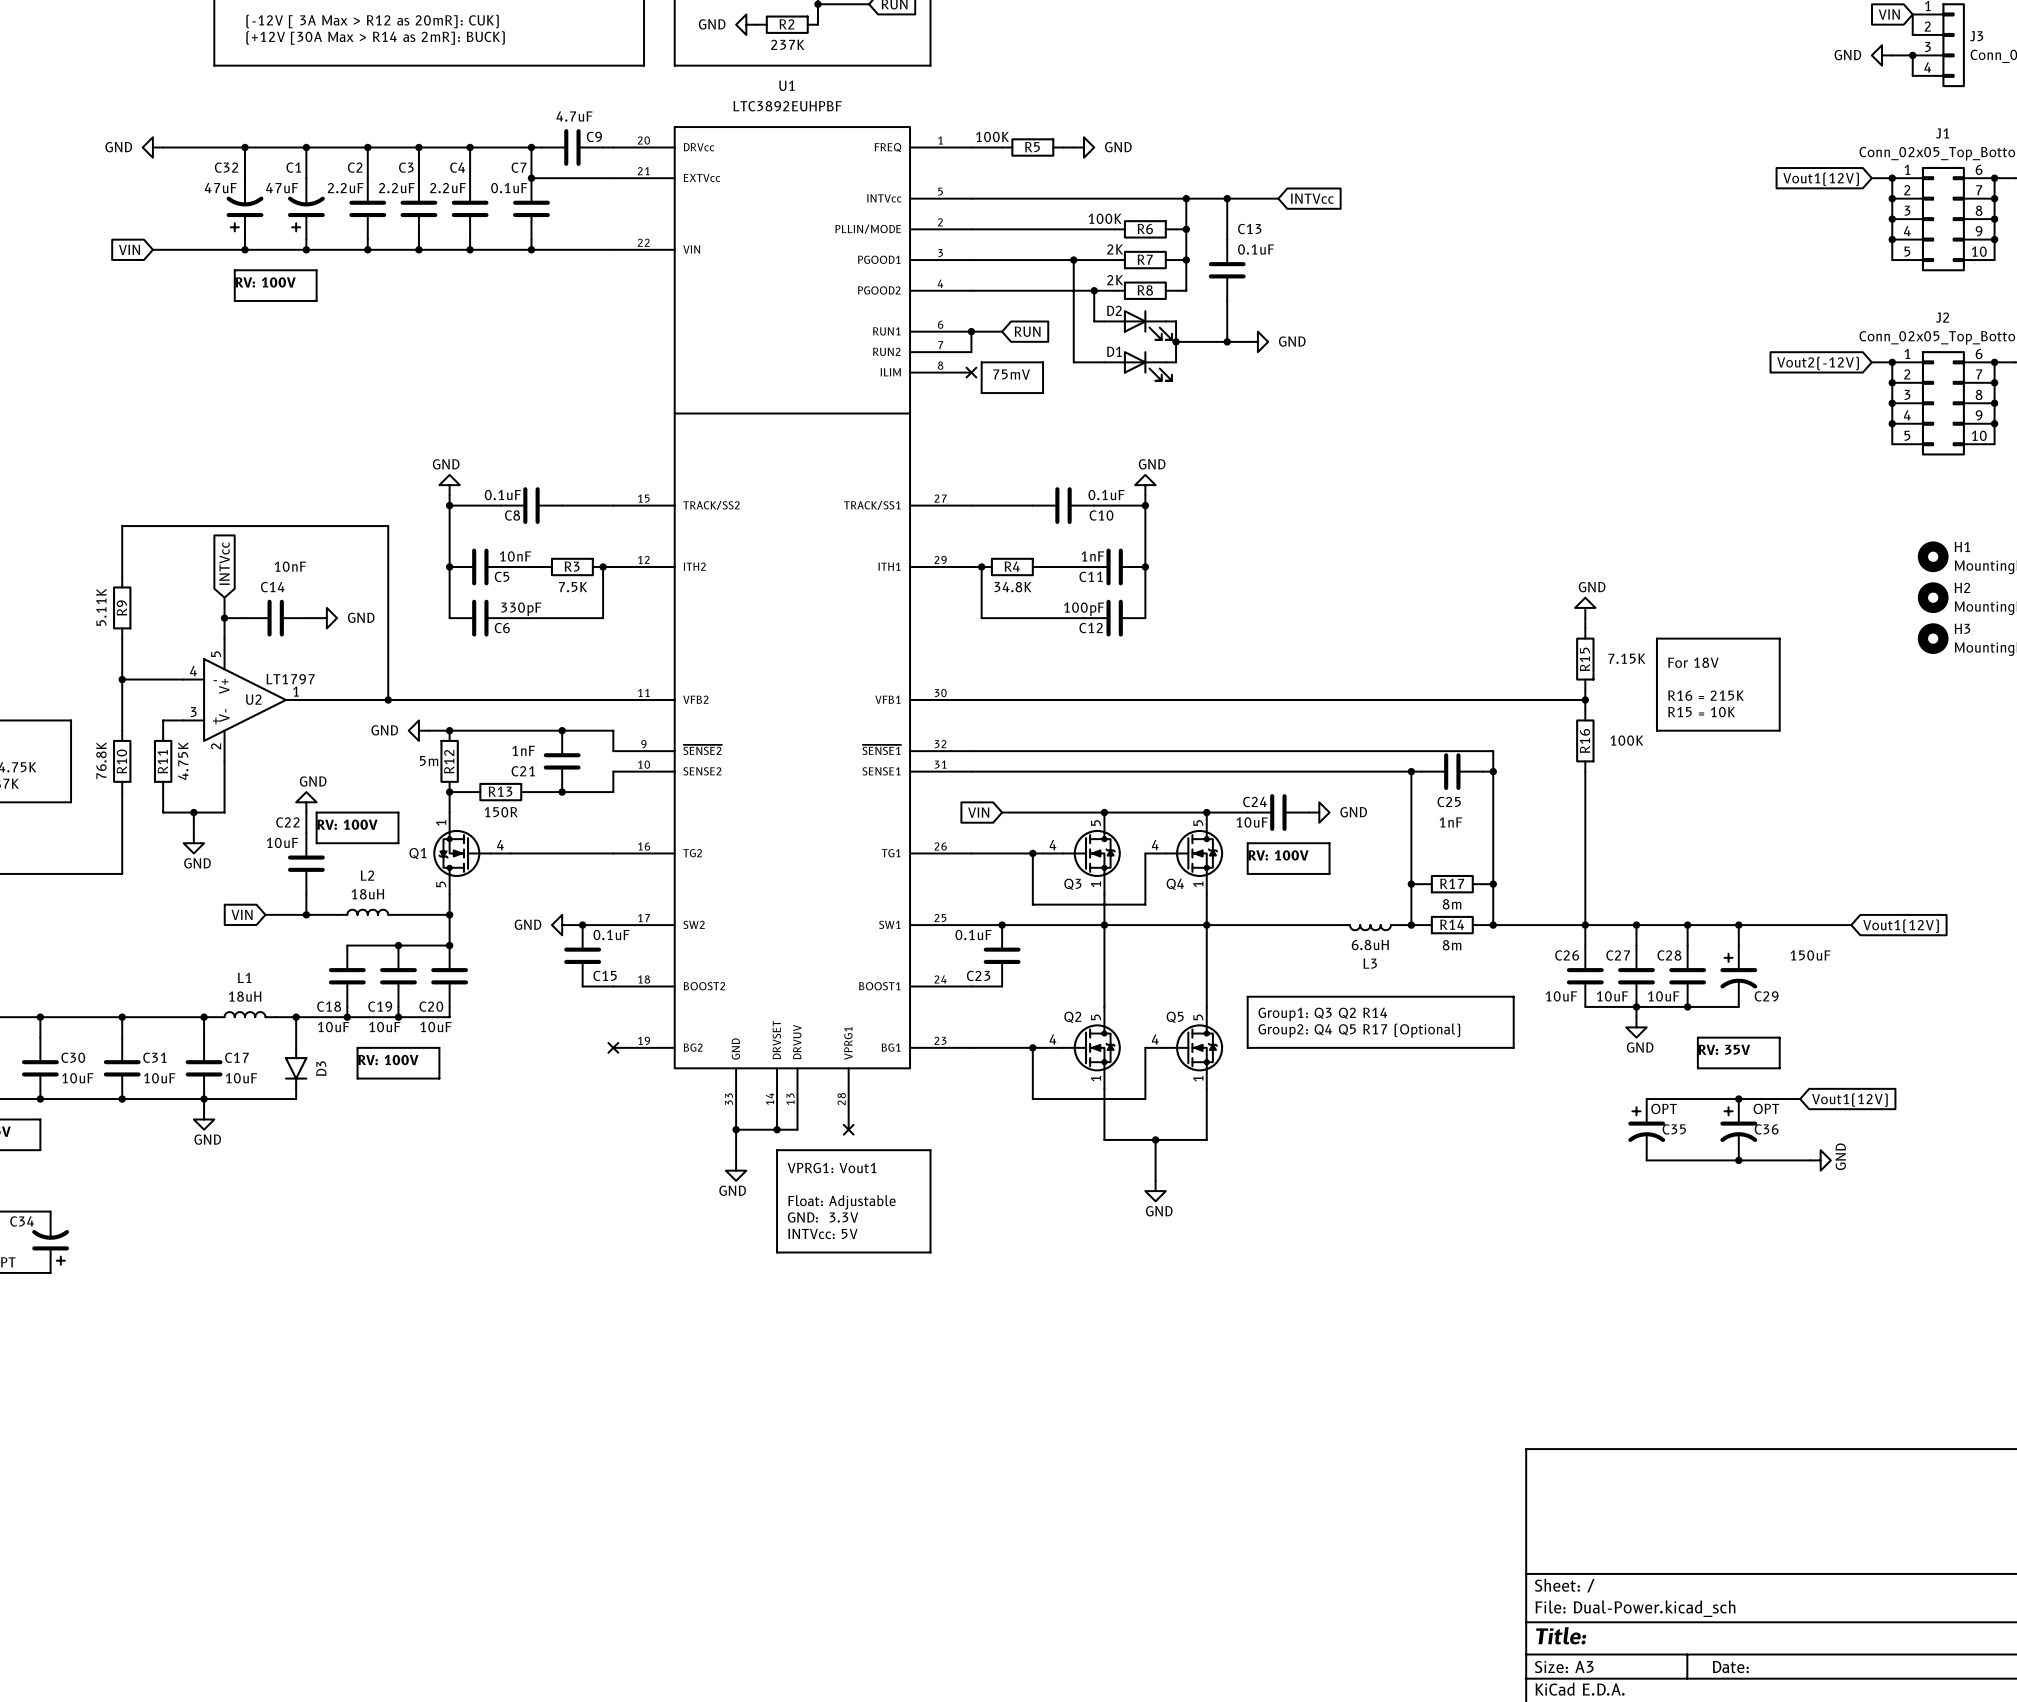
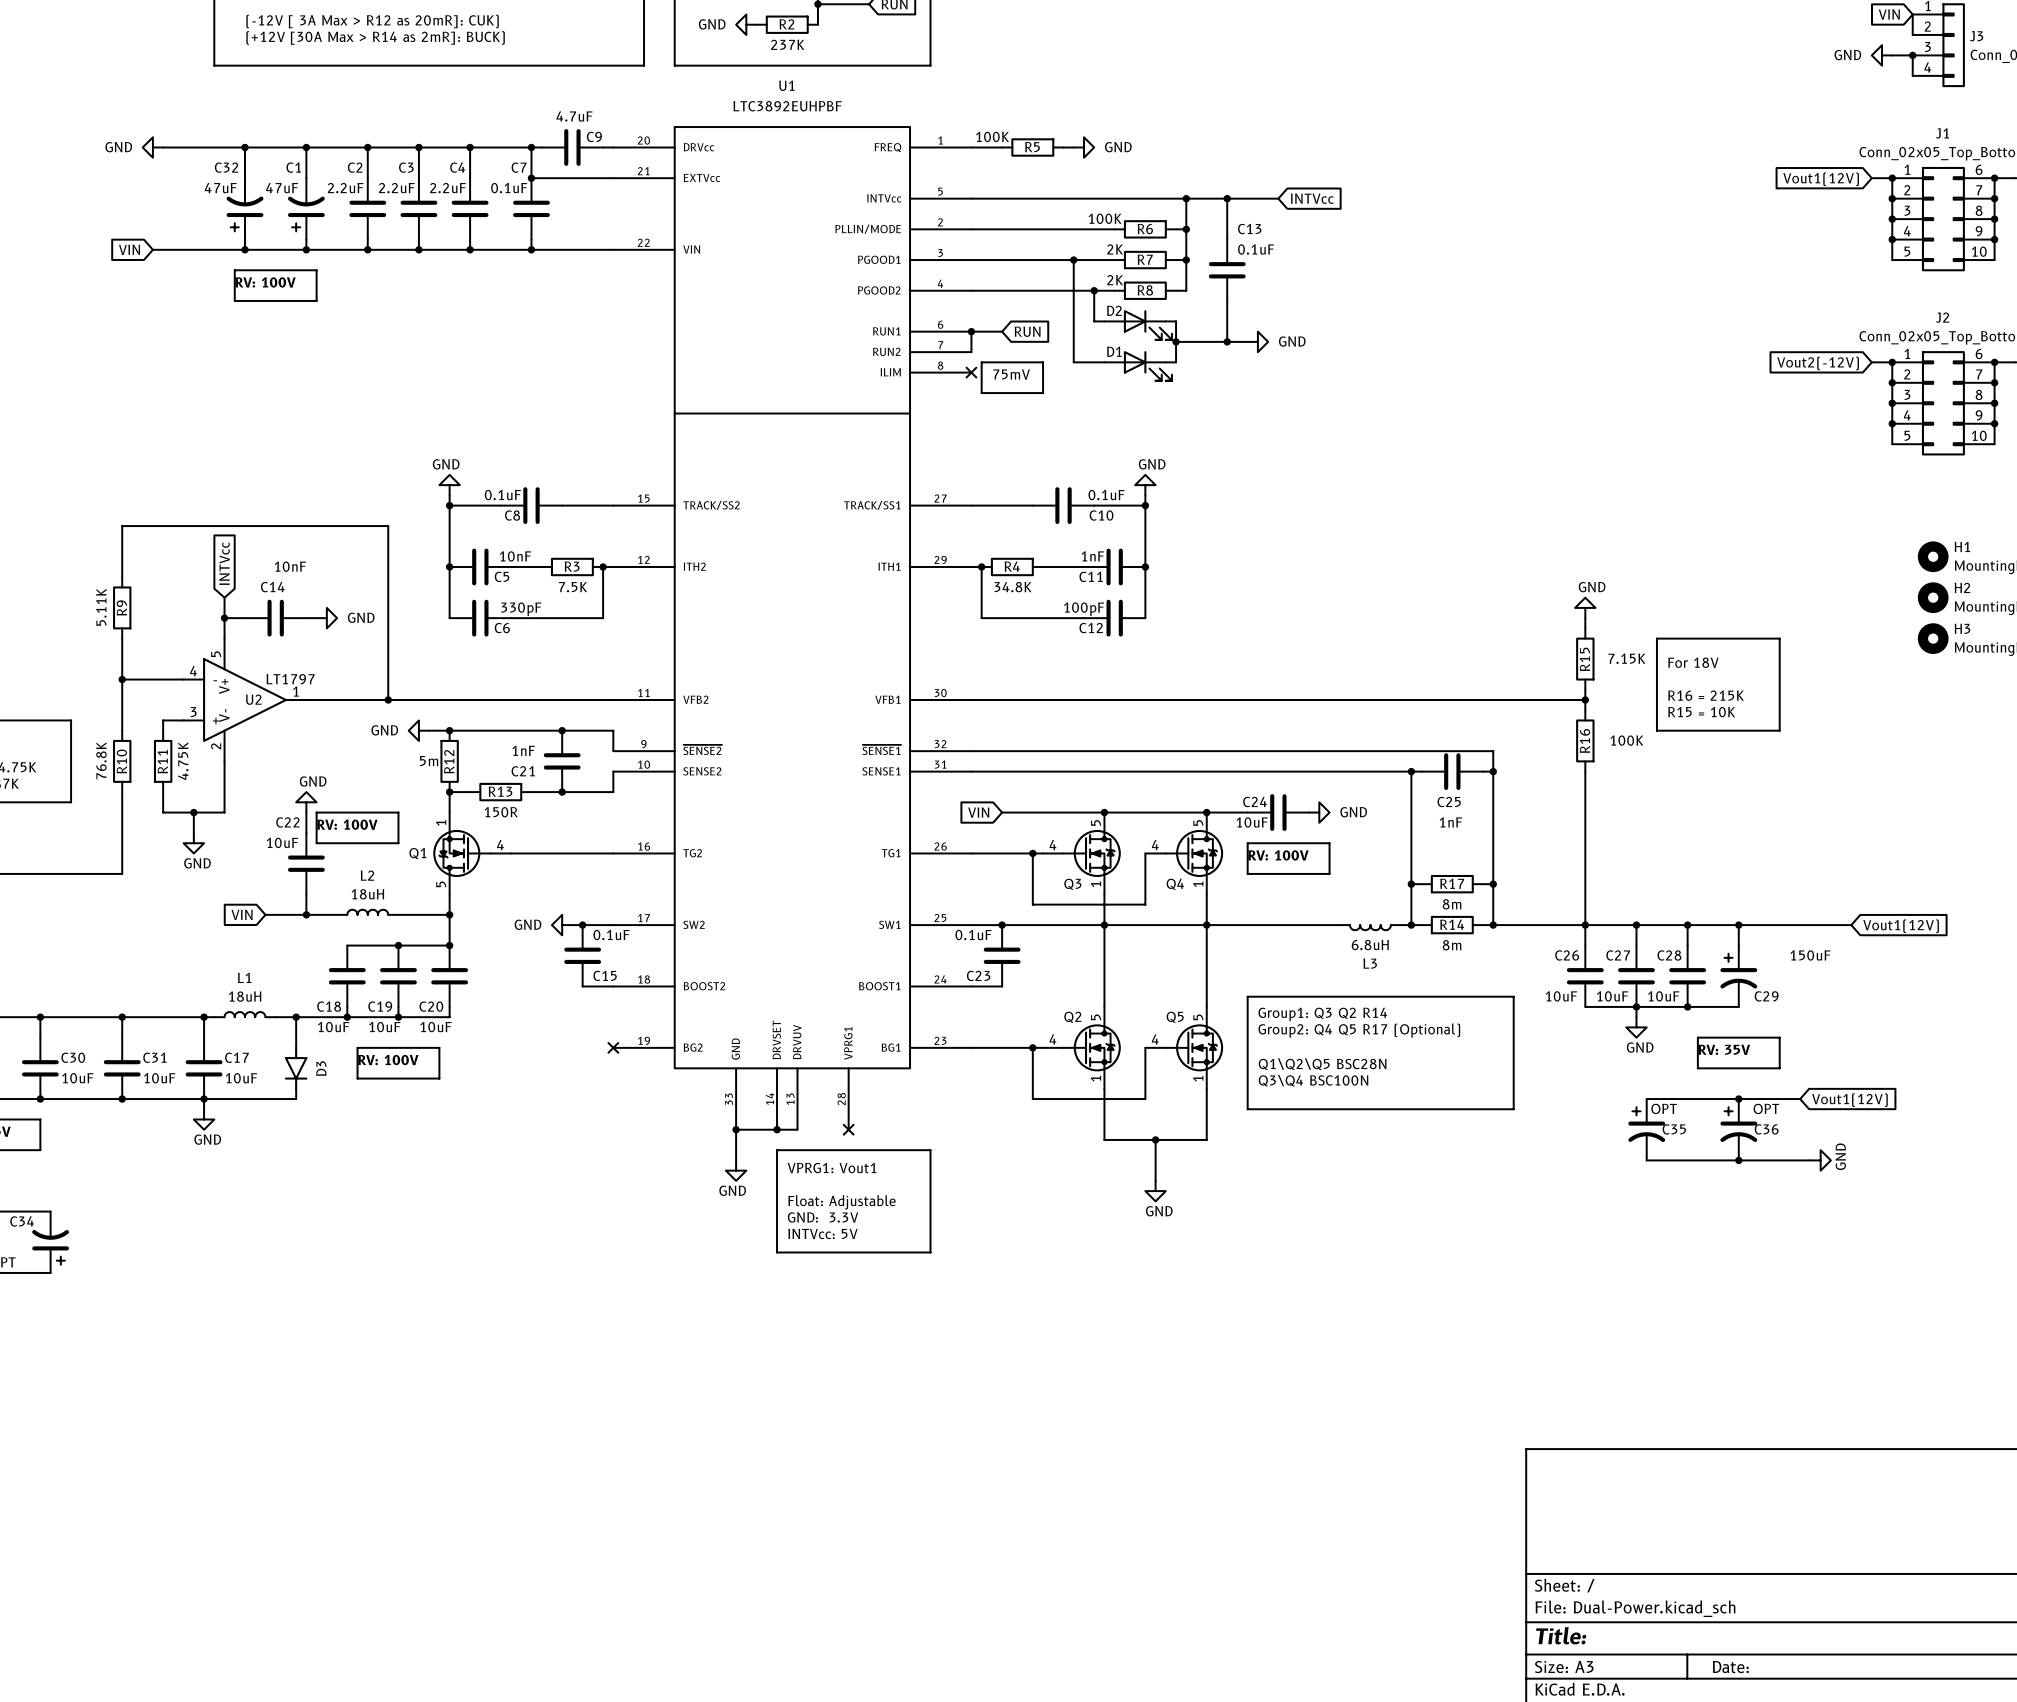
line: (1247, 1047) (1513, 1047) -> (1247, 1047) (1247, 1109) (1513, 1109) (1513, 1047)
text: none -> Q1\Q2\Q5 BSC28N (1322, 1064)
text: none -> Q3\Q4 BSC100N (1313, 1080)

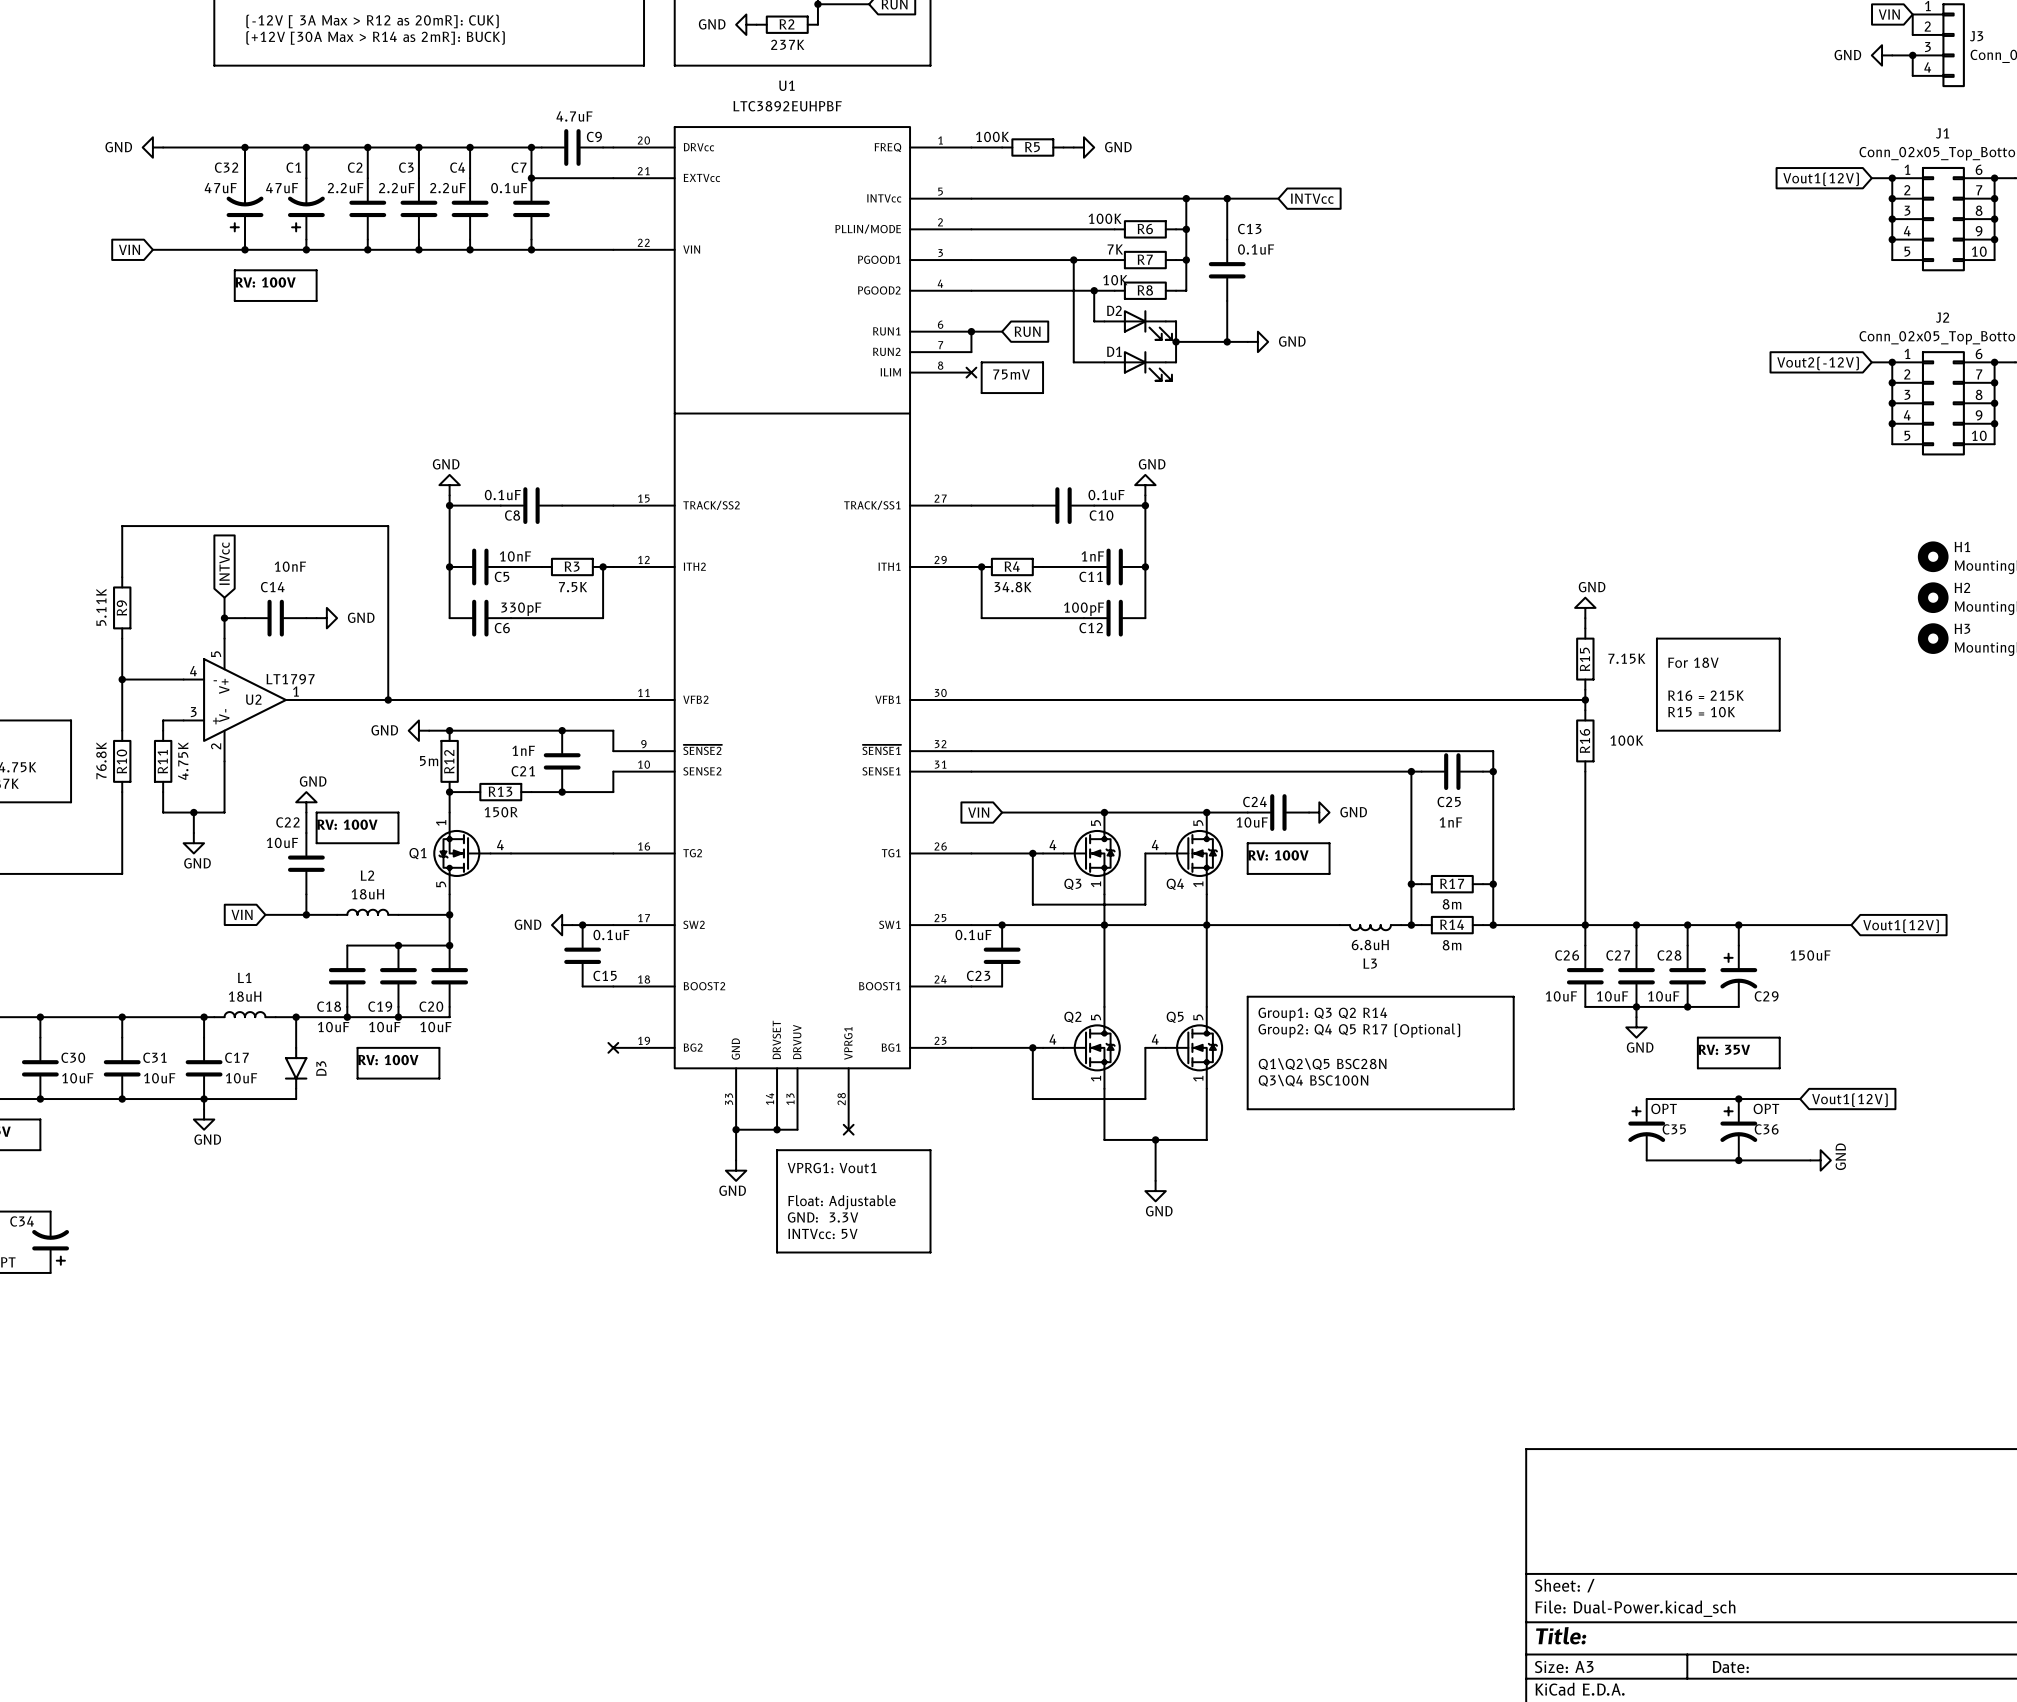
R7 value: 2K (1115, 249) -> 7K (1115, 249)
R8 value: 2K (1115, 280) -> 10K (1115, 280)

